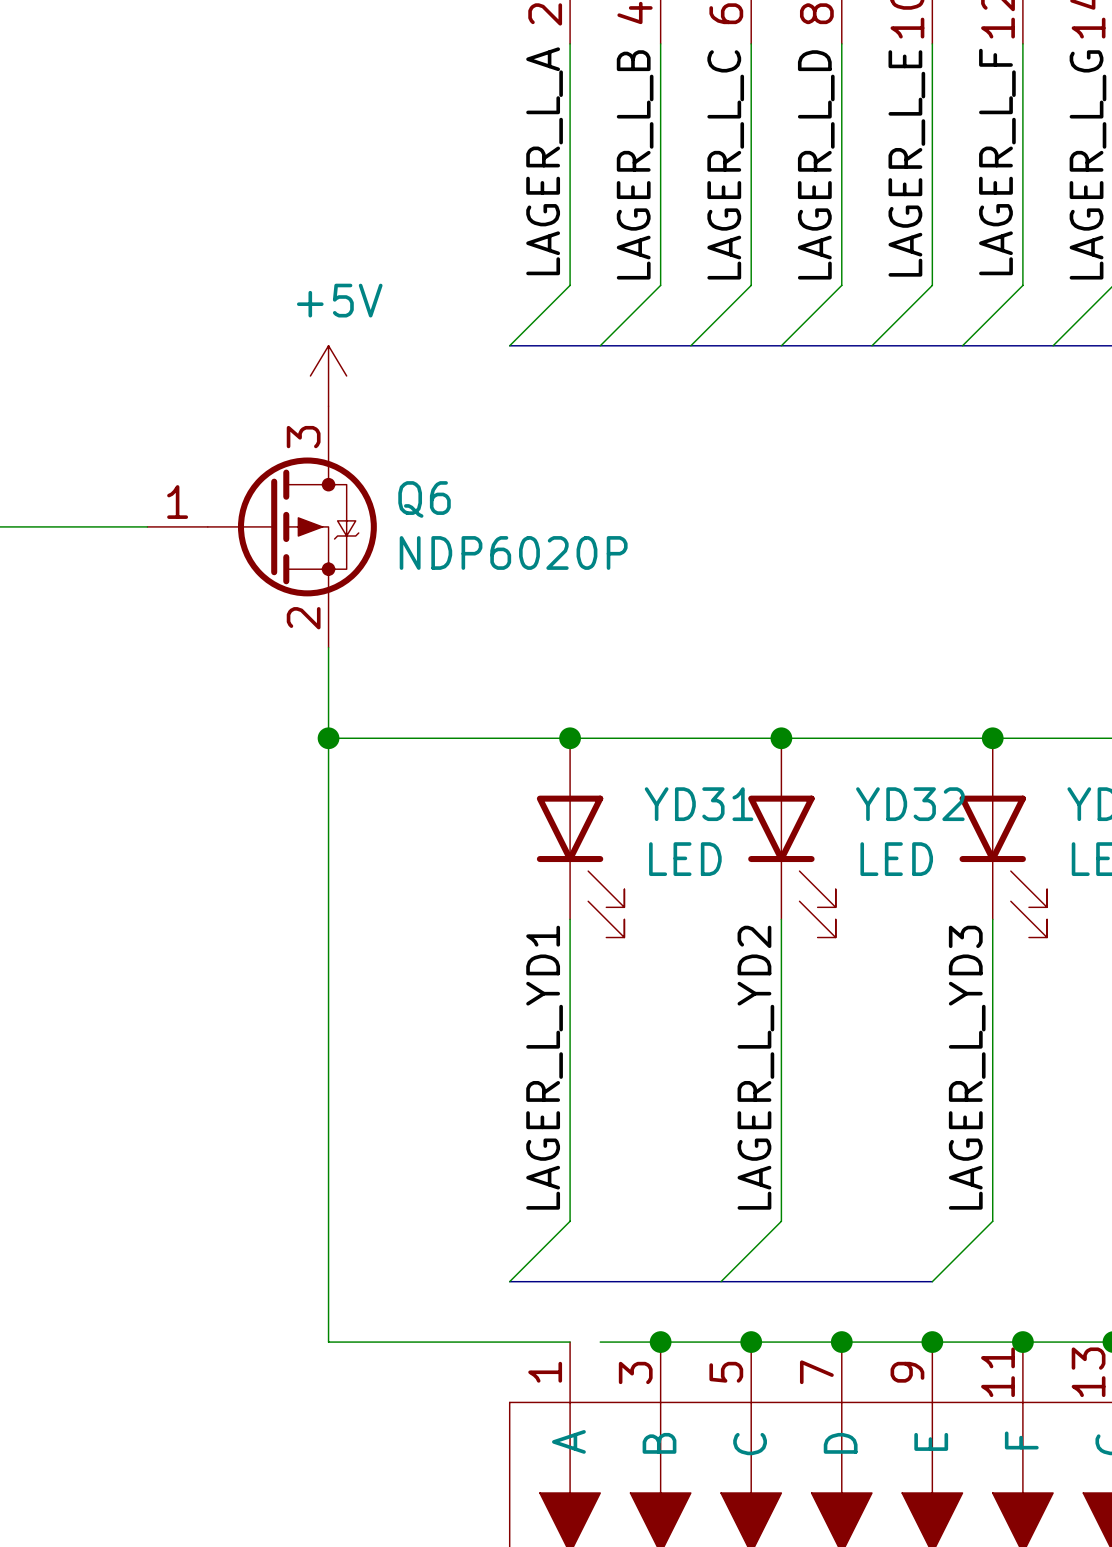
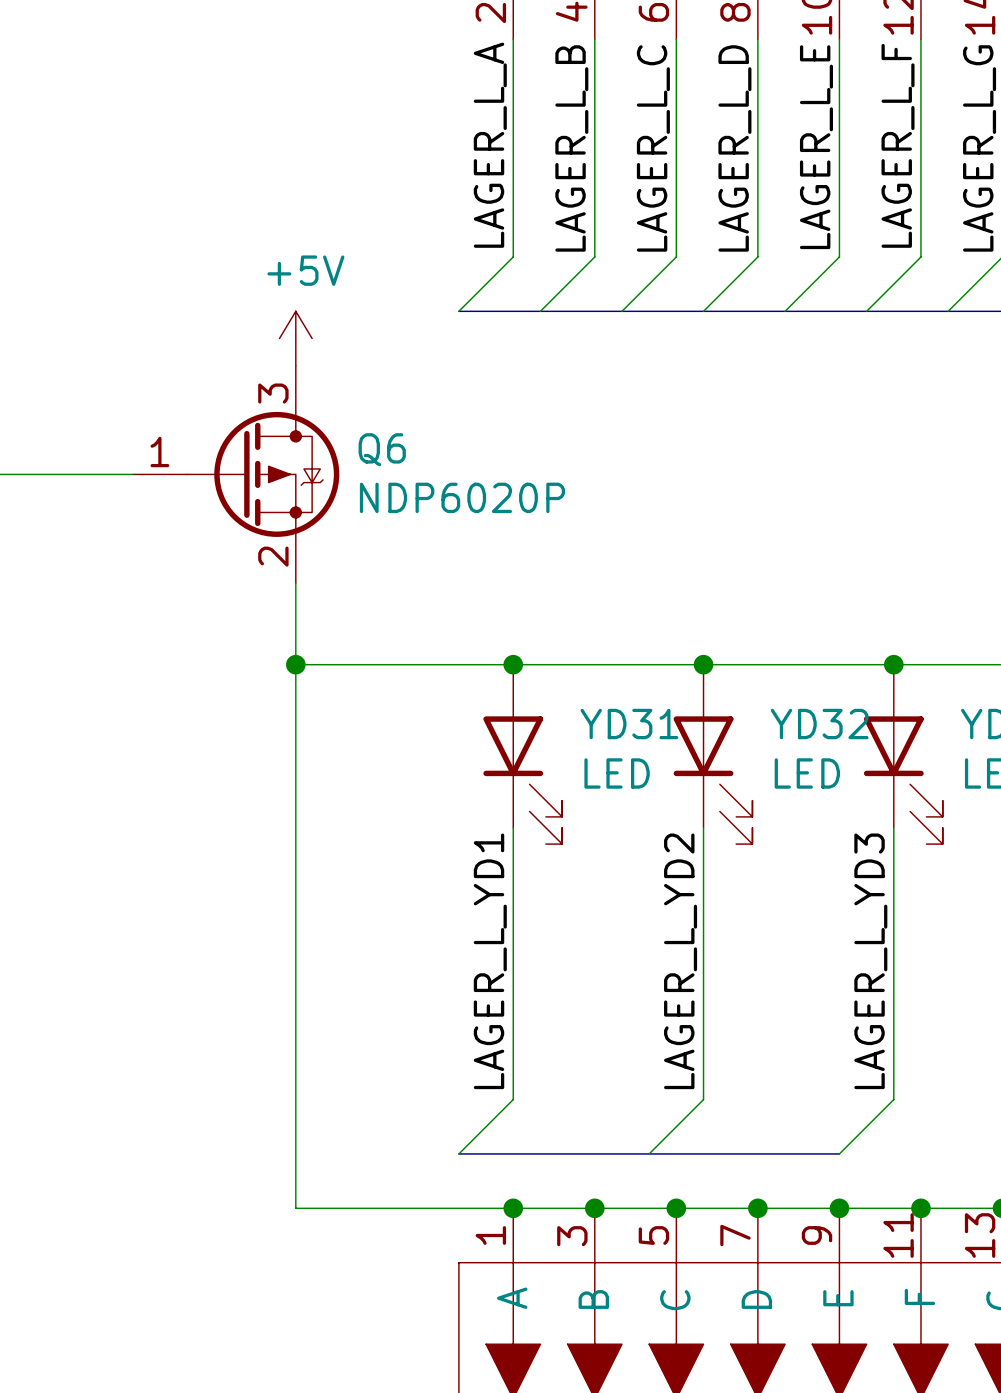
wire: none -> (513, 1208) (540, 1208)
junction: none -> (513, 1208)

